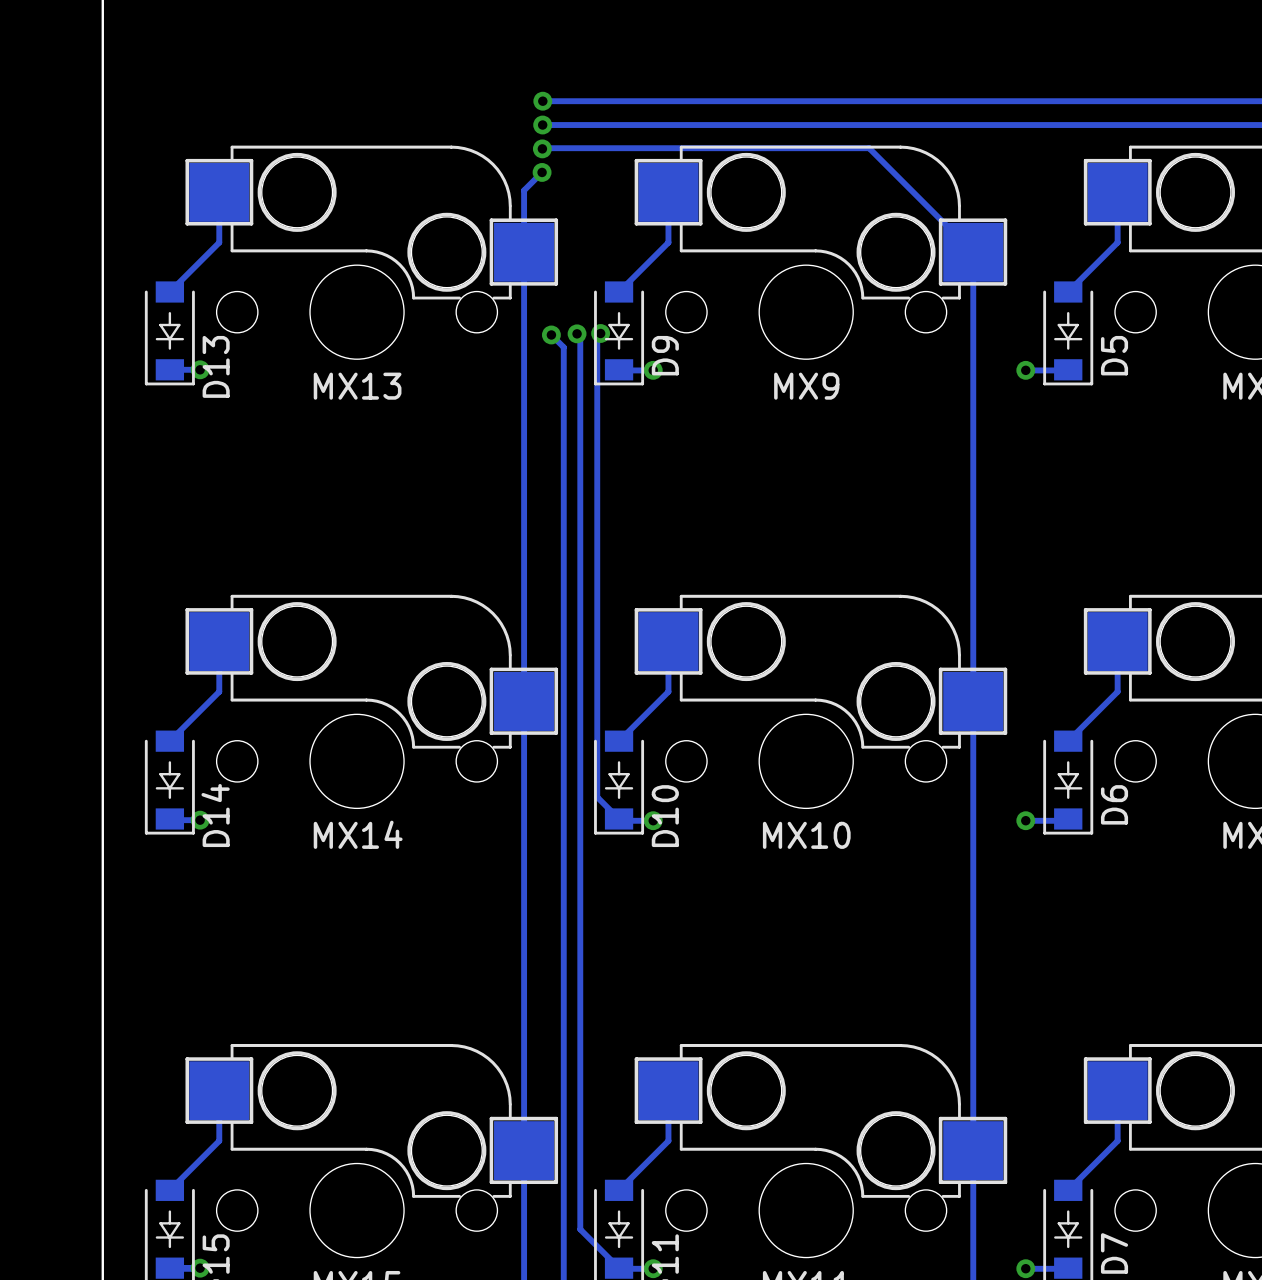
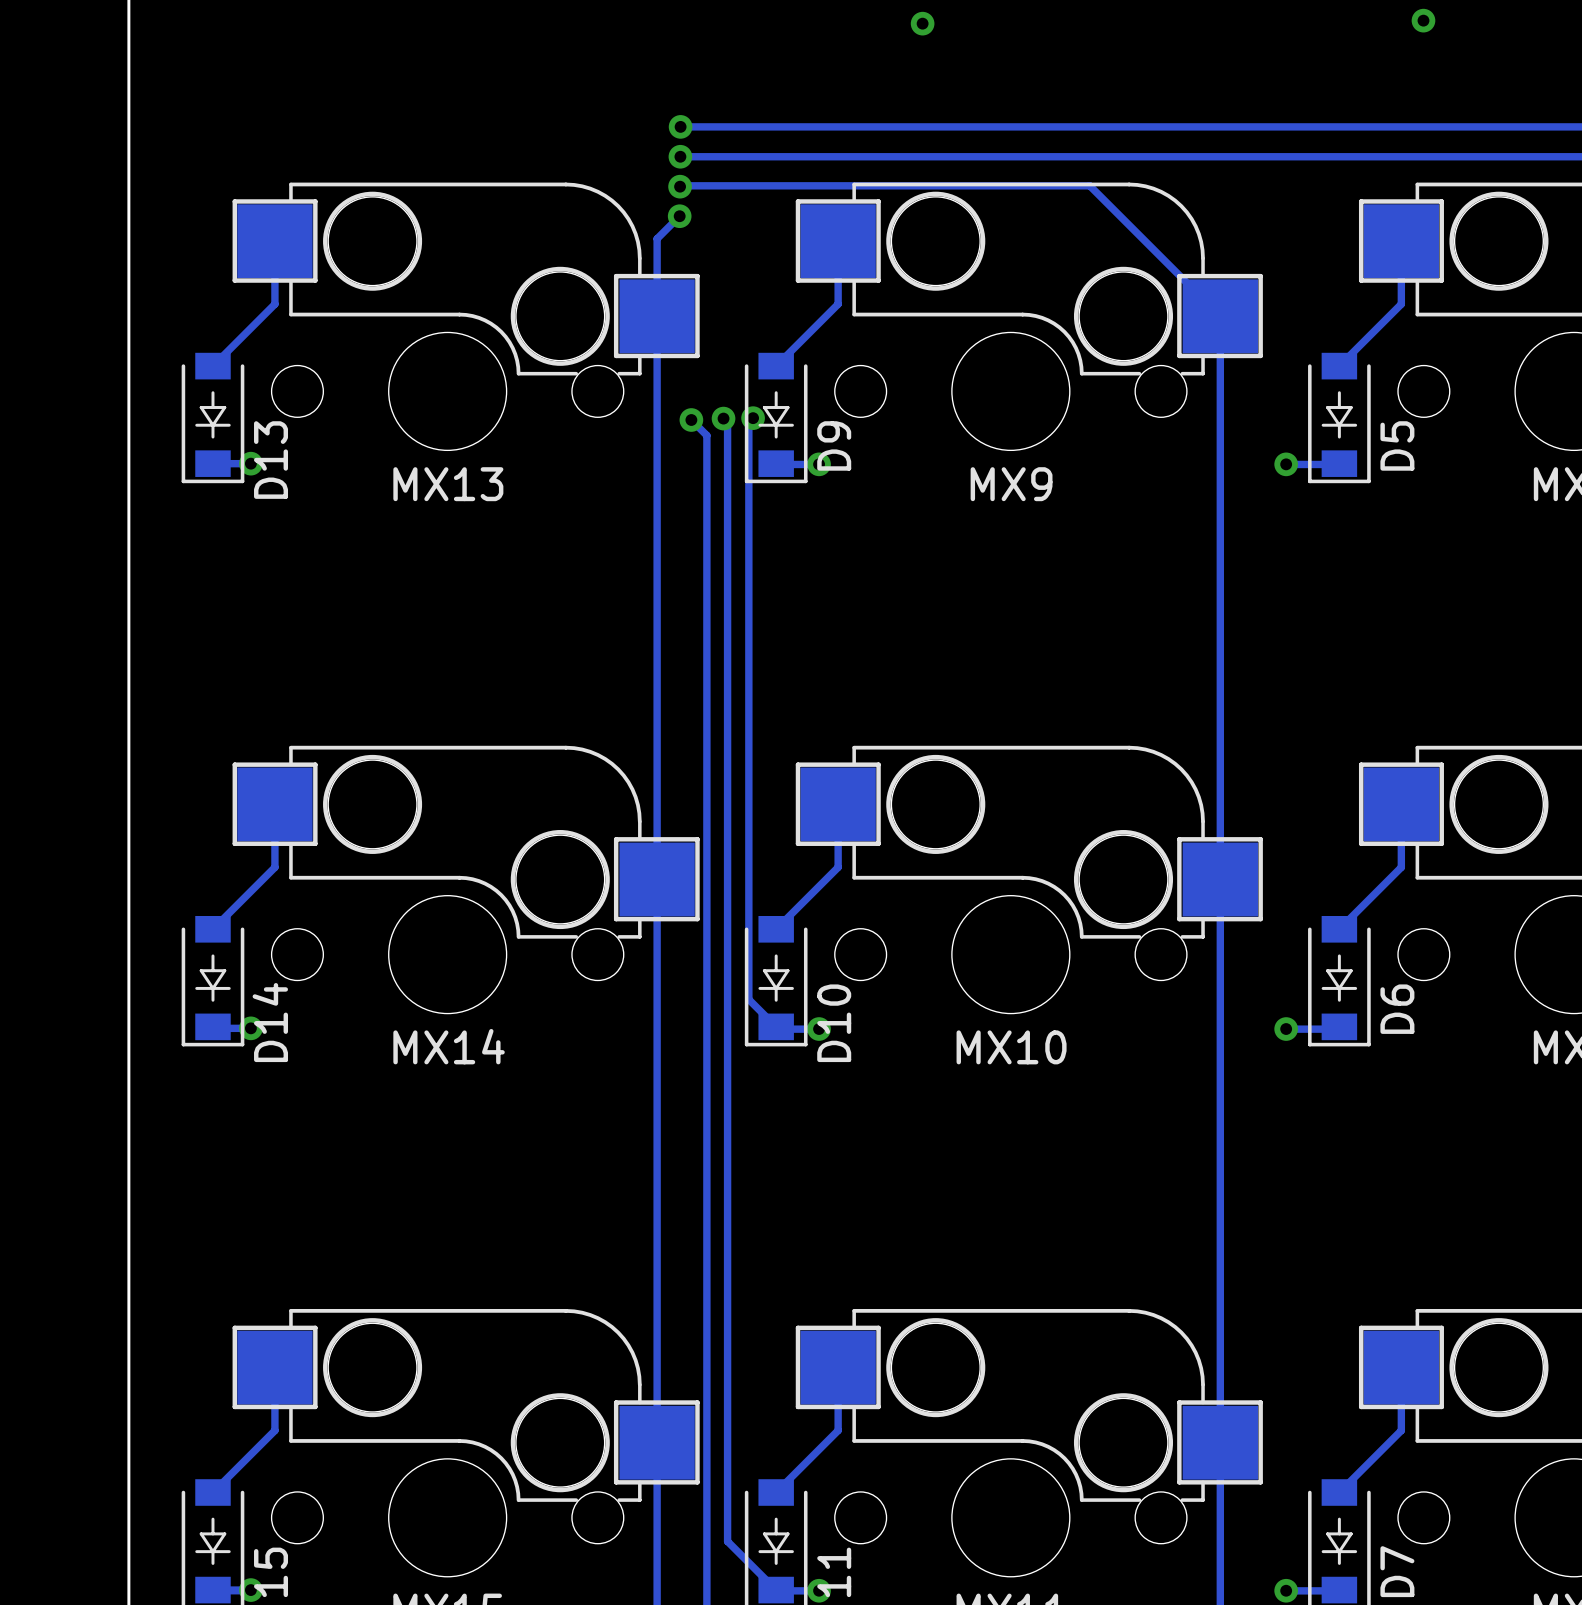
via: none -> (1423, 20)
via: none -> (922, 23)

